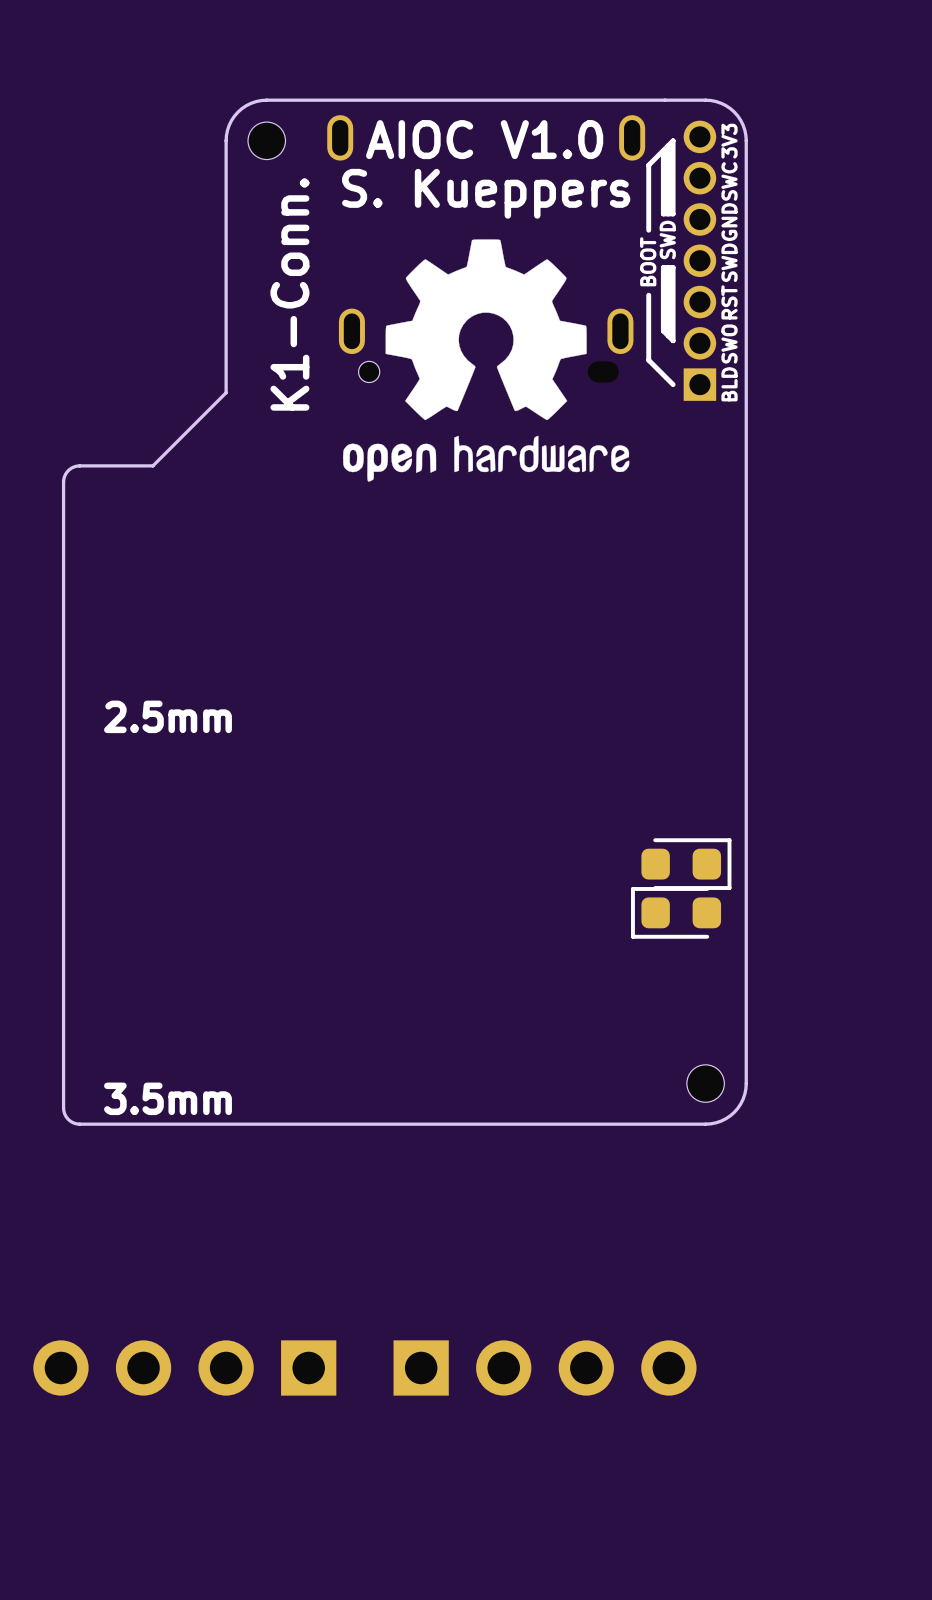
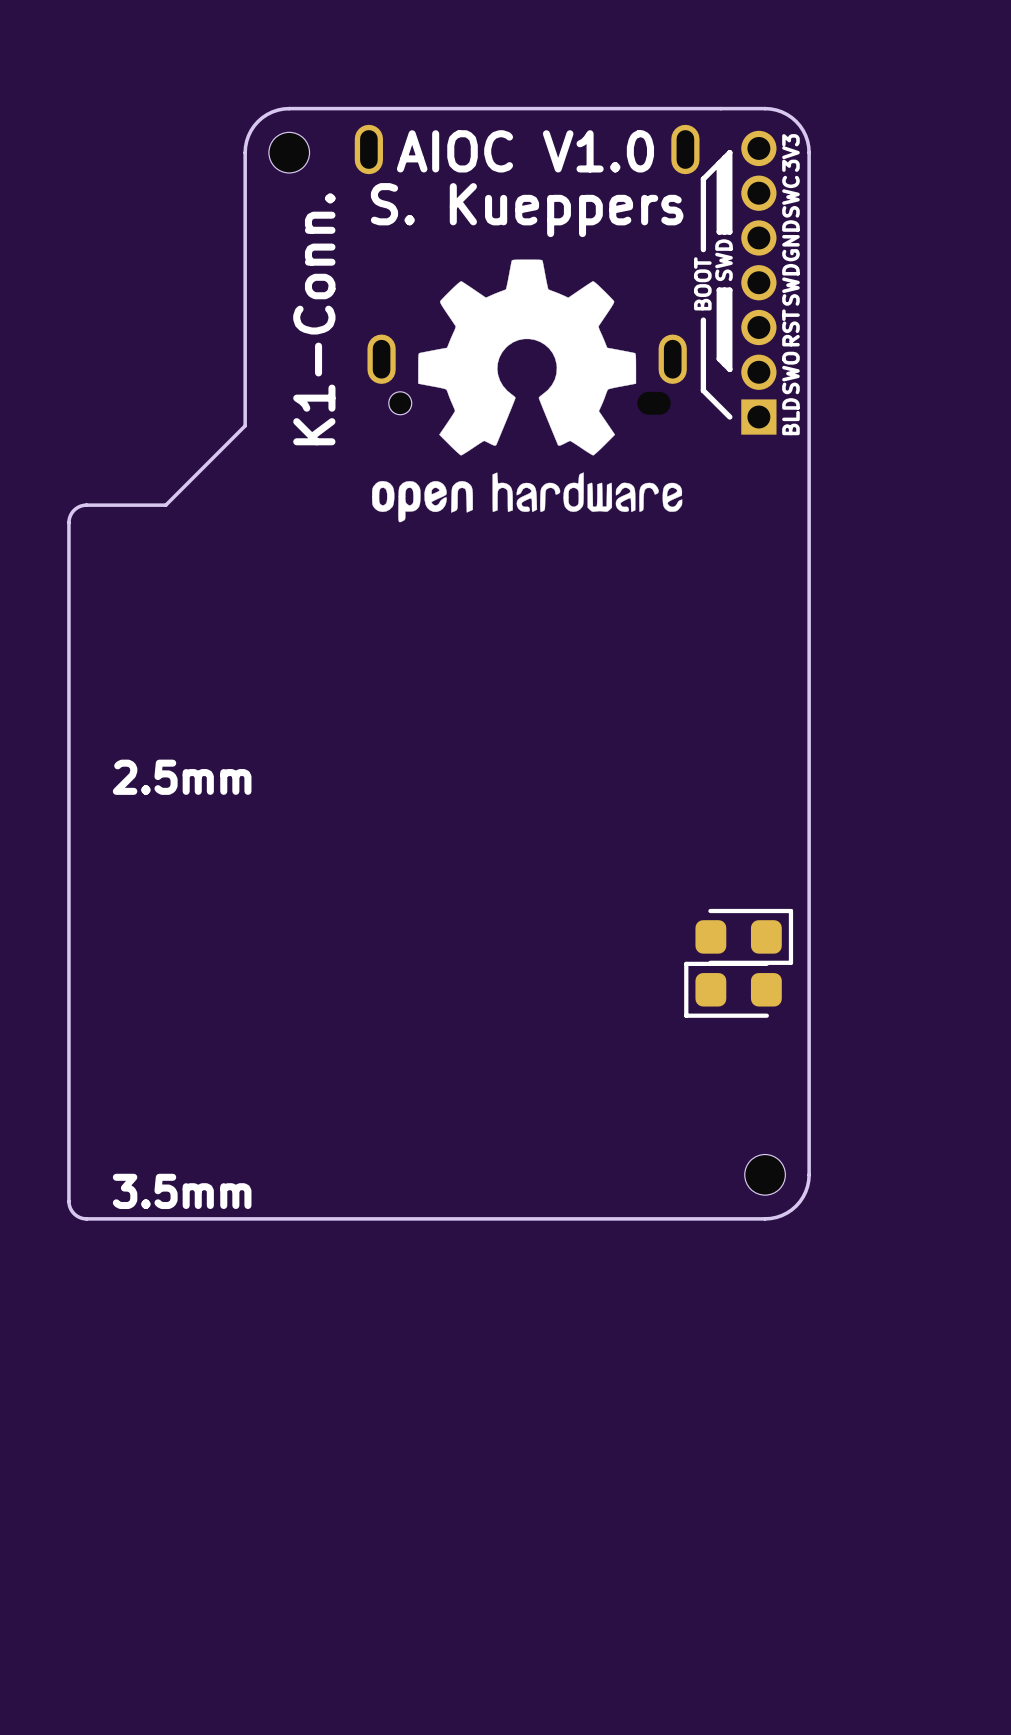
part: (184, 1367) -> none
part: (545, 1367) -> none

